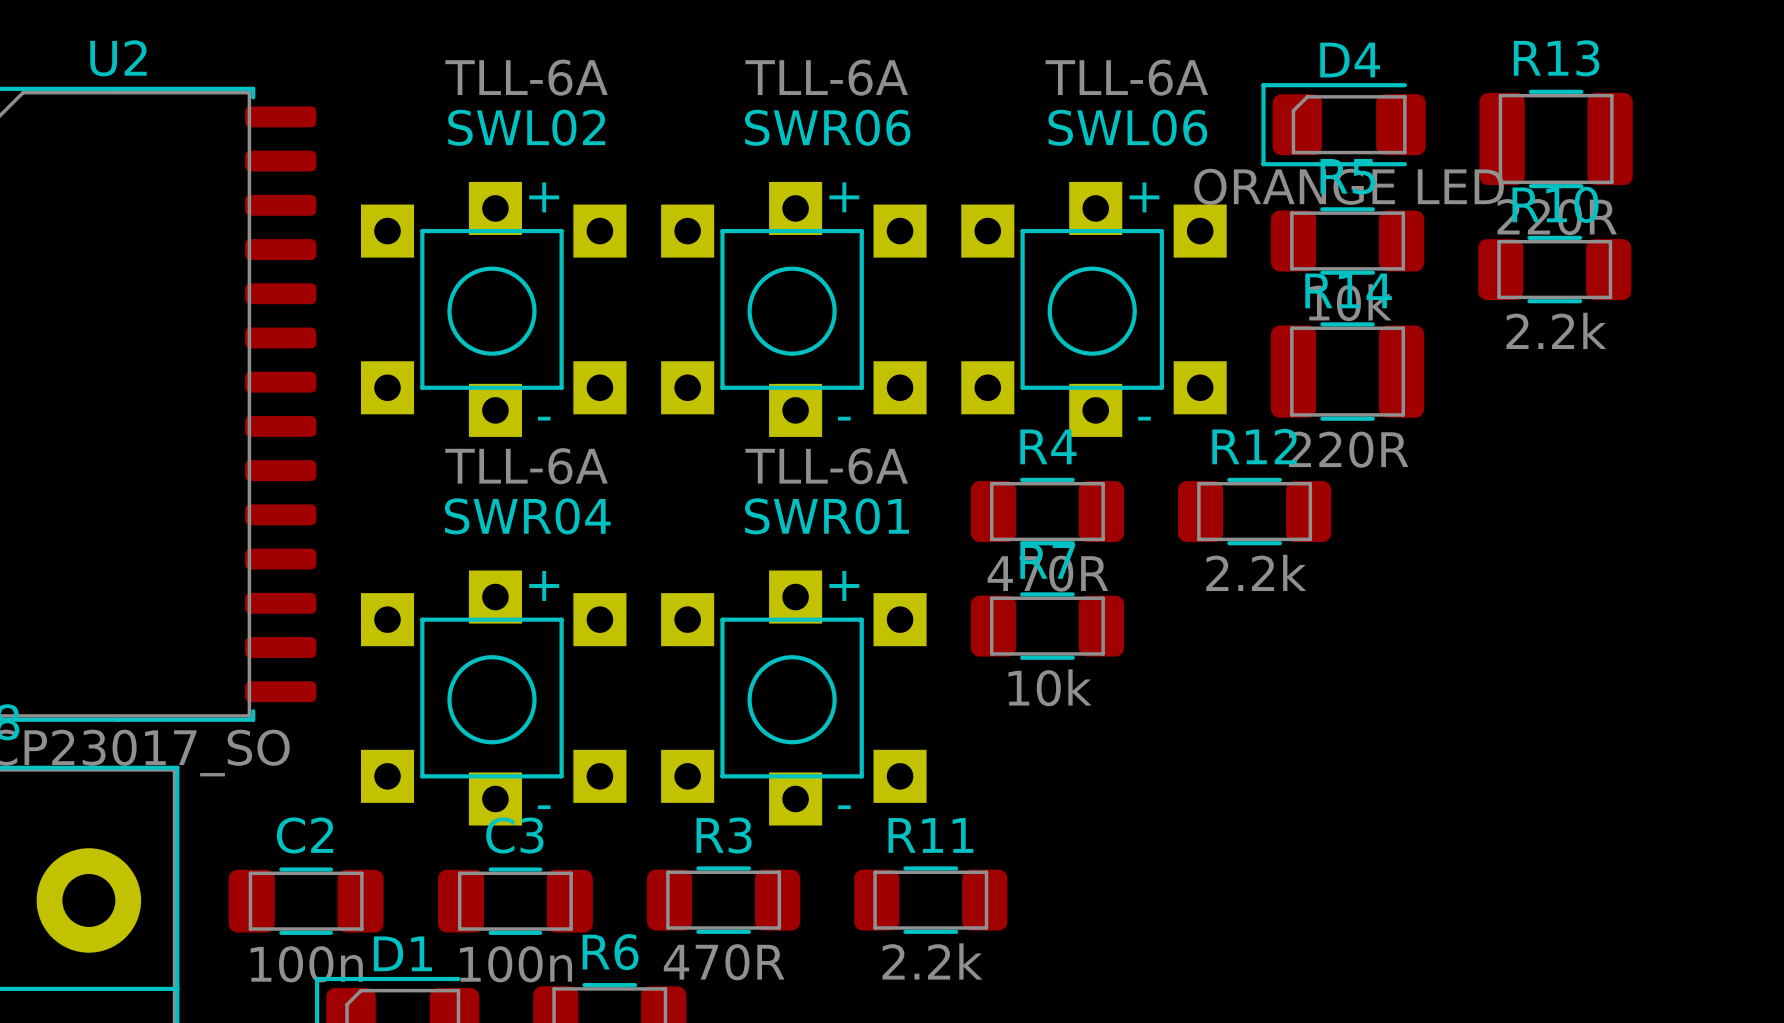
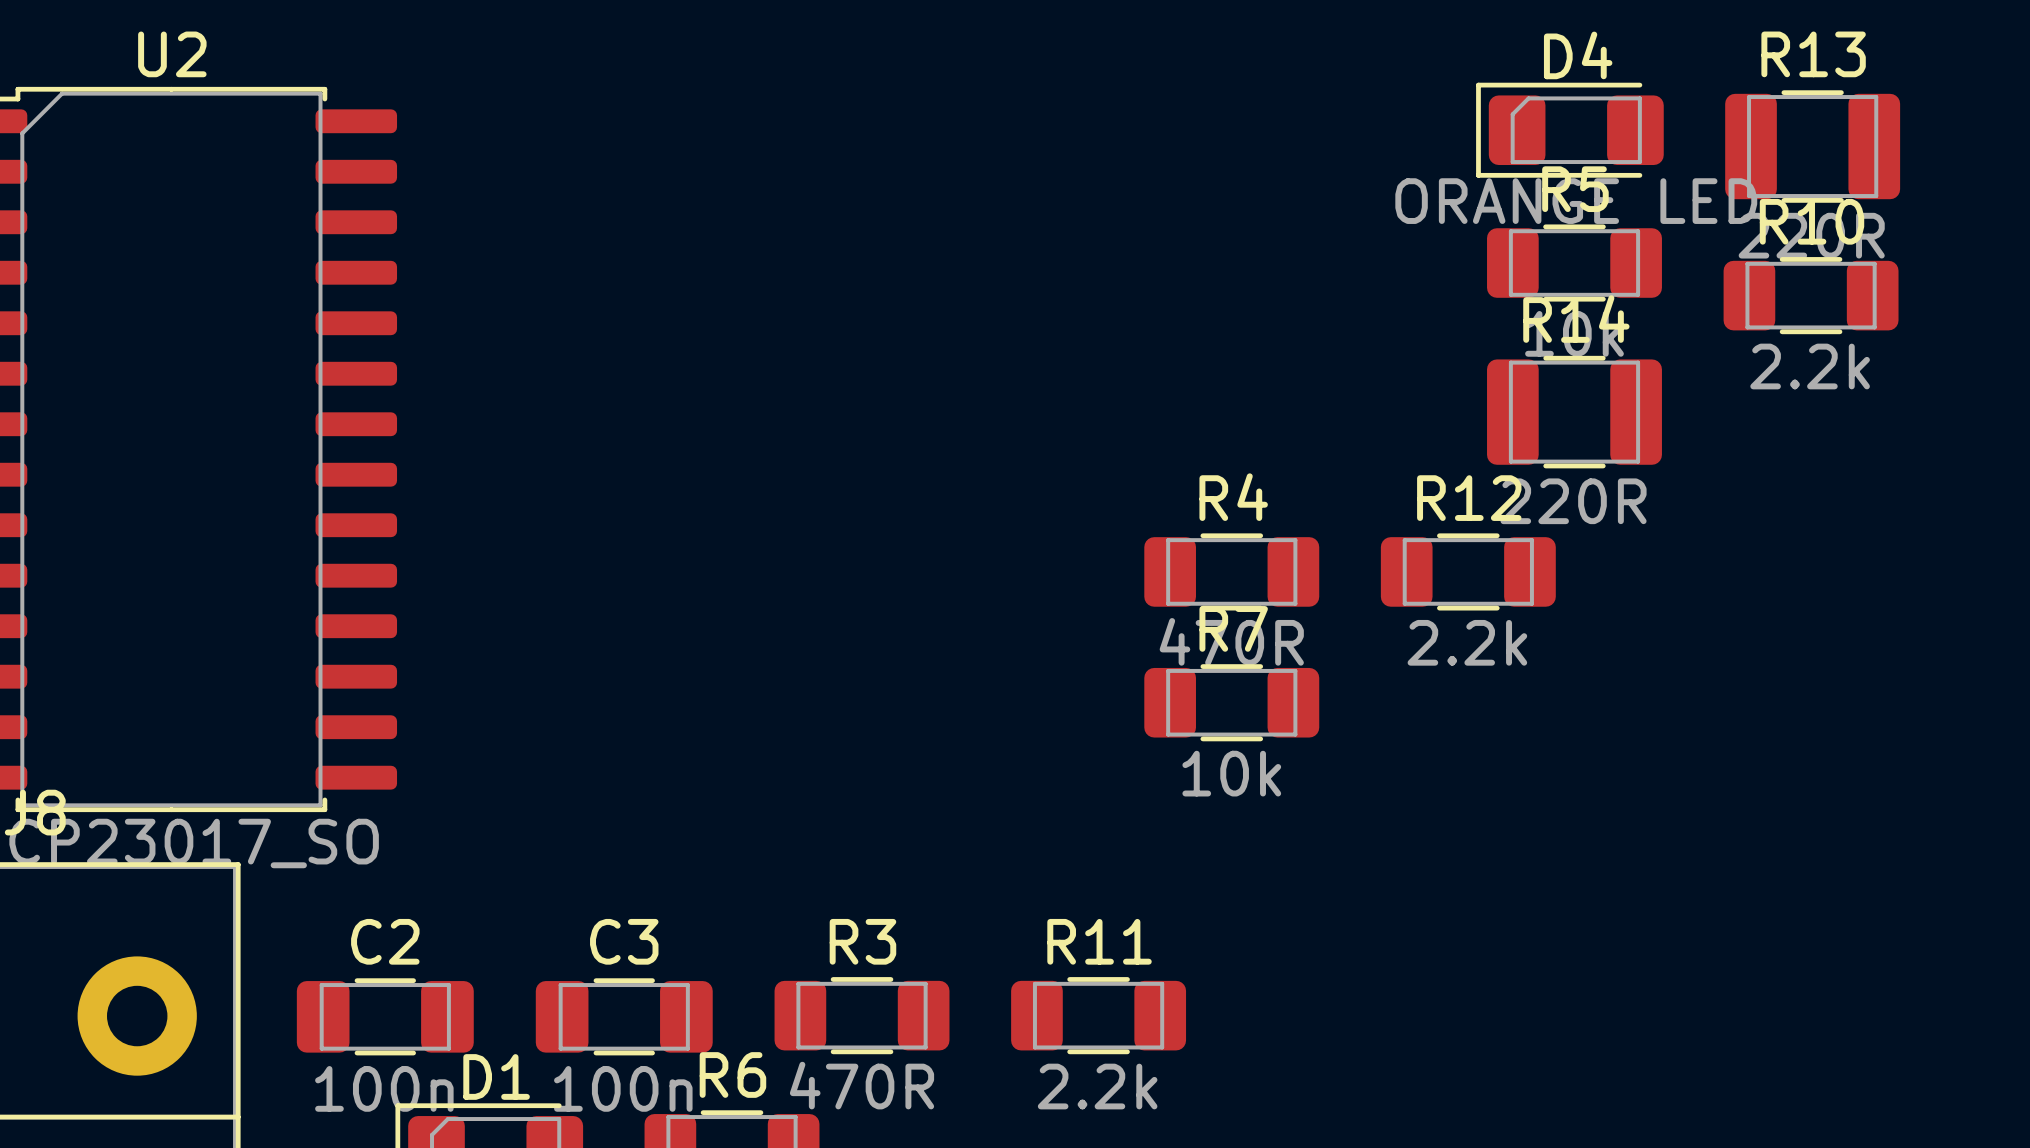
SWL02: TLL-6A (493, 309) -> none
SWR06: TLL-6A (793, 309) -> none
SWL06: TLL-6A (1093, 309) -> none
SWR04: TLL-6A (493, 698) -> none
SWR01: TLL-6A (793, 698) -> none

